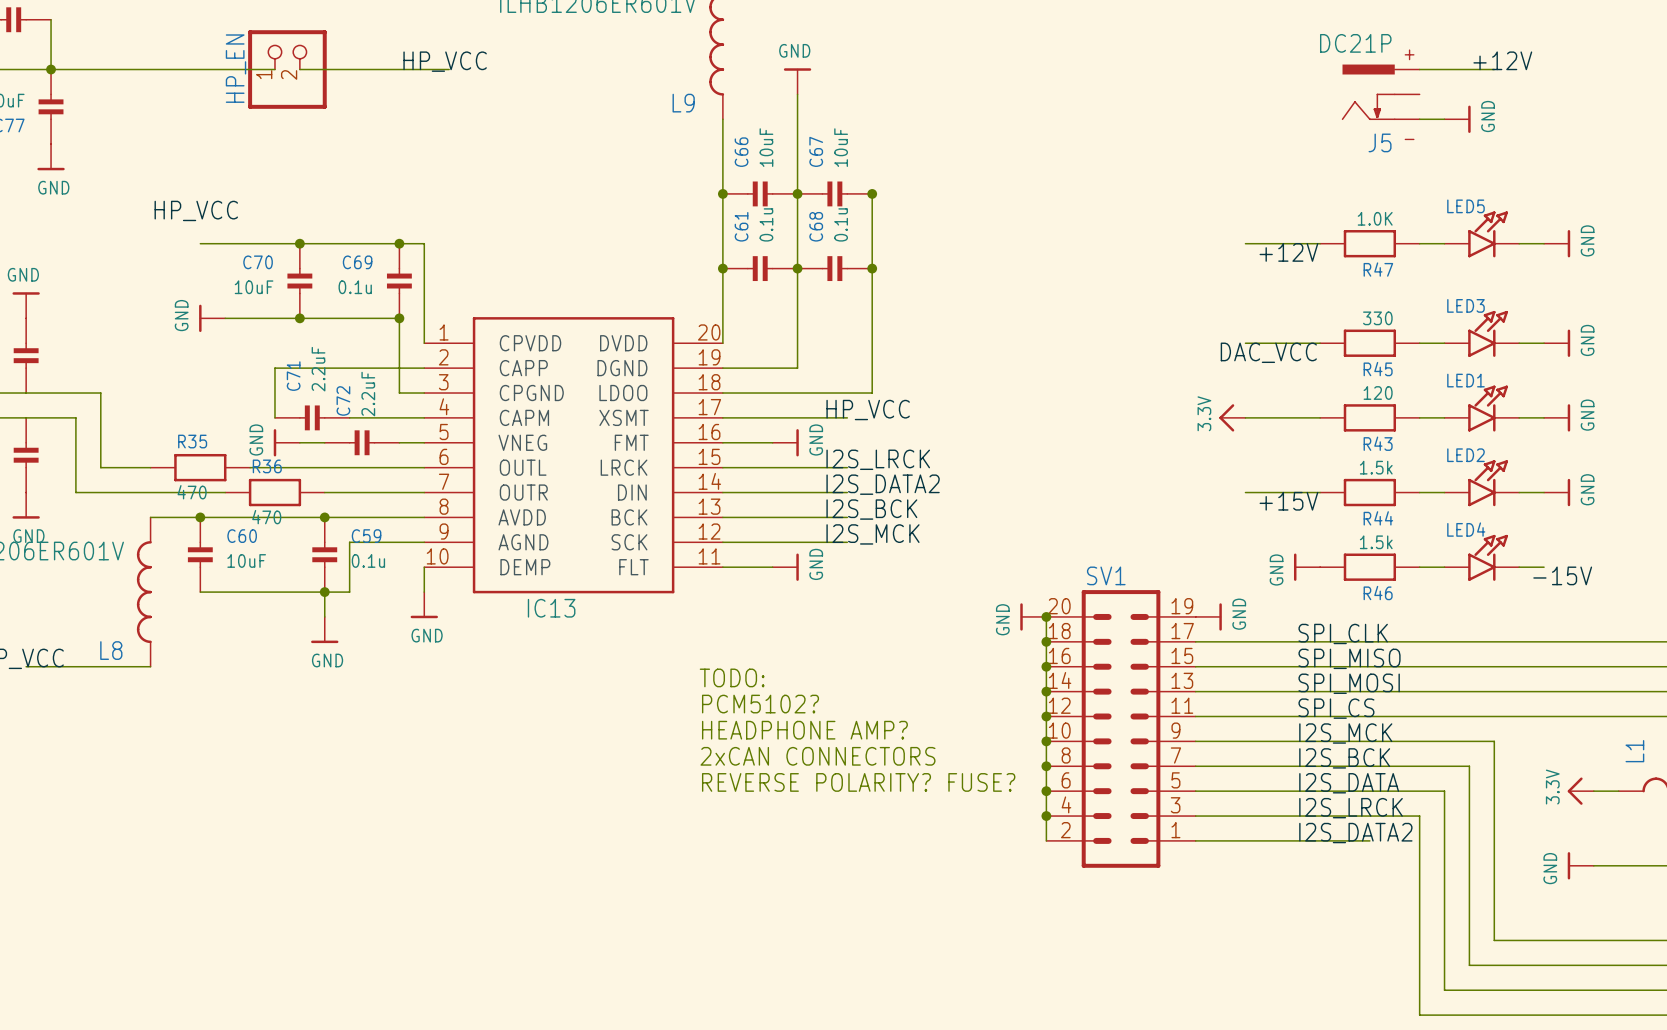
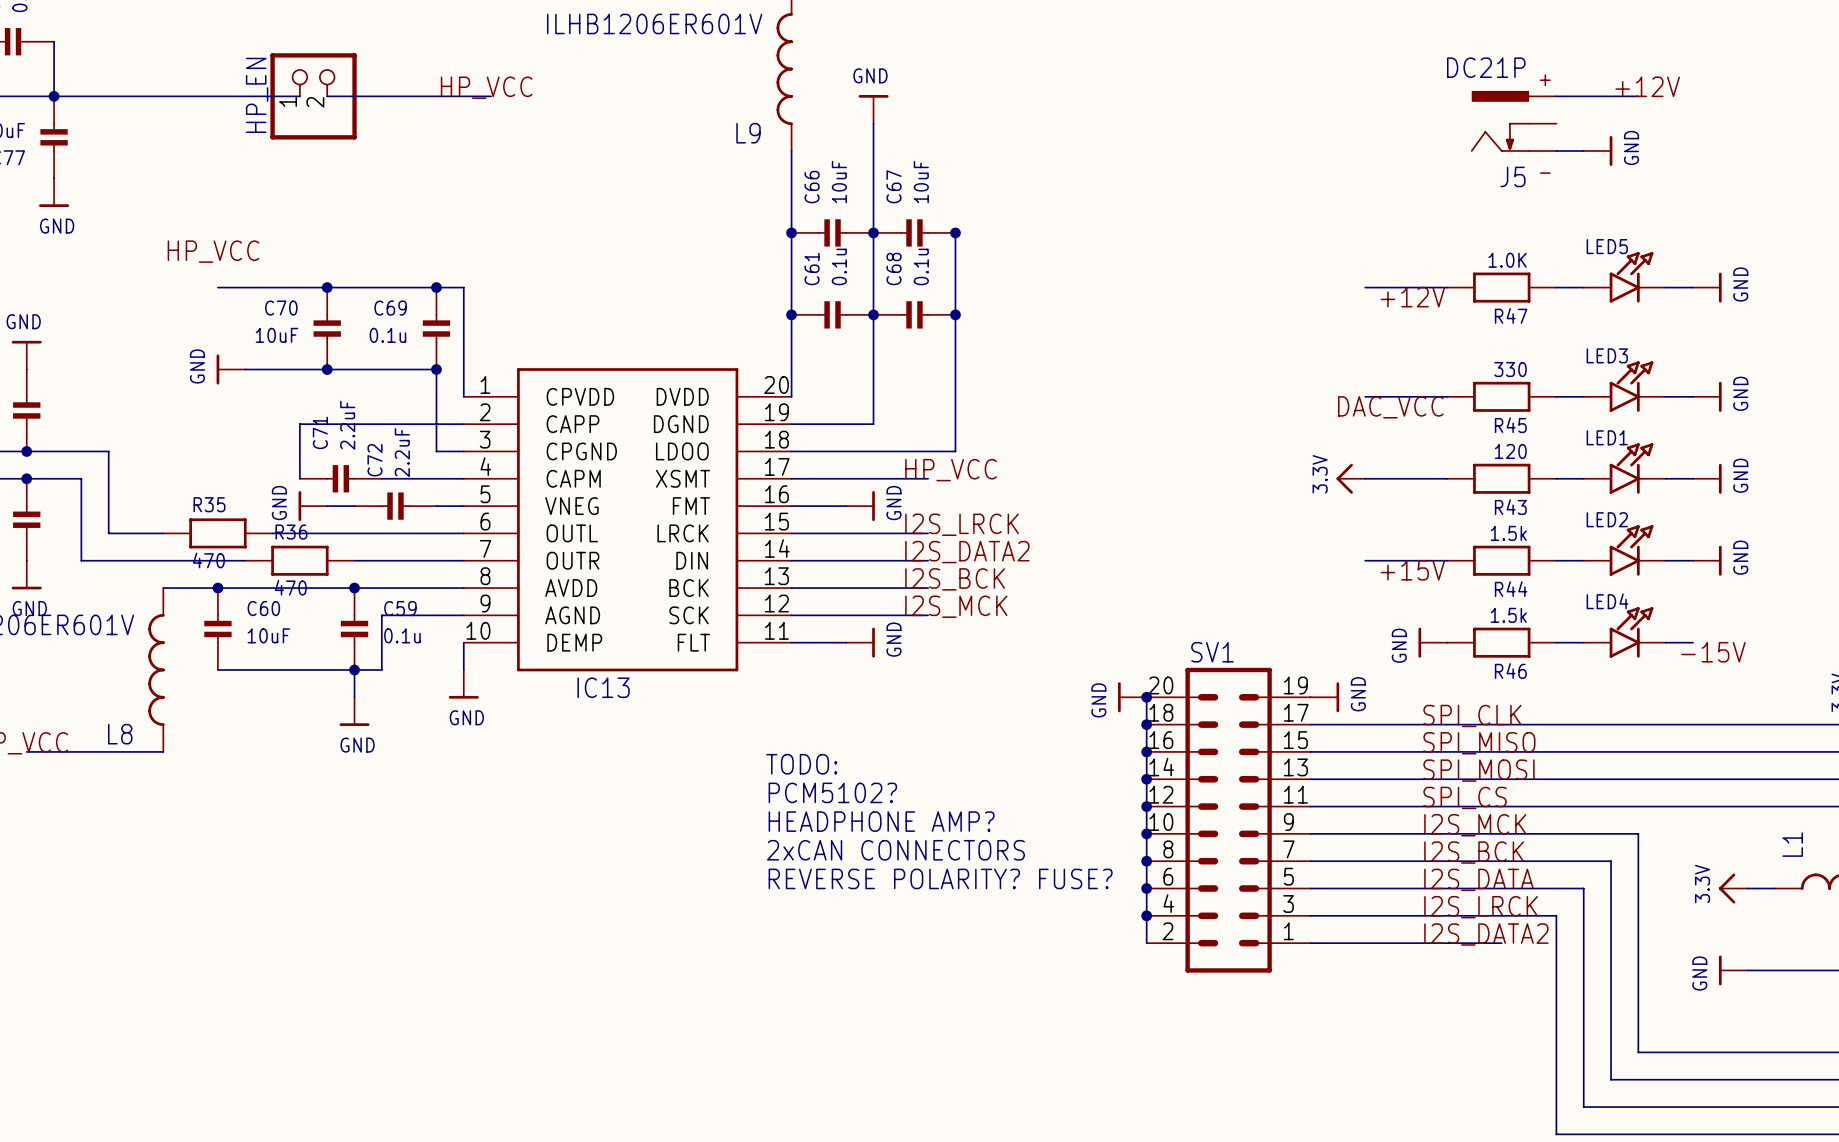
junction: none -> (26, 451)
junction: none -> (26, 478)

